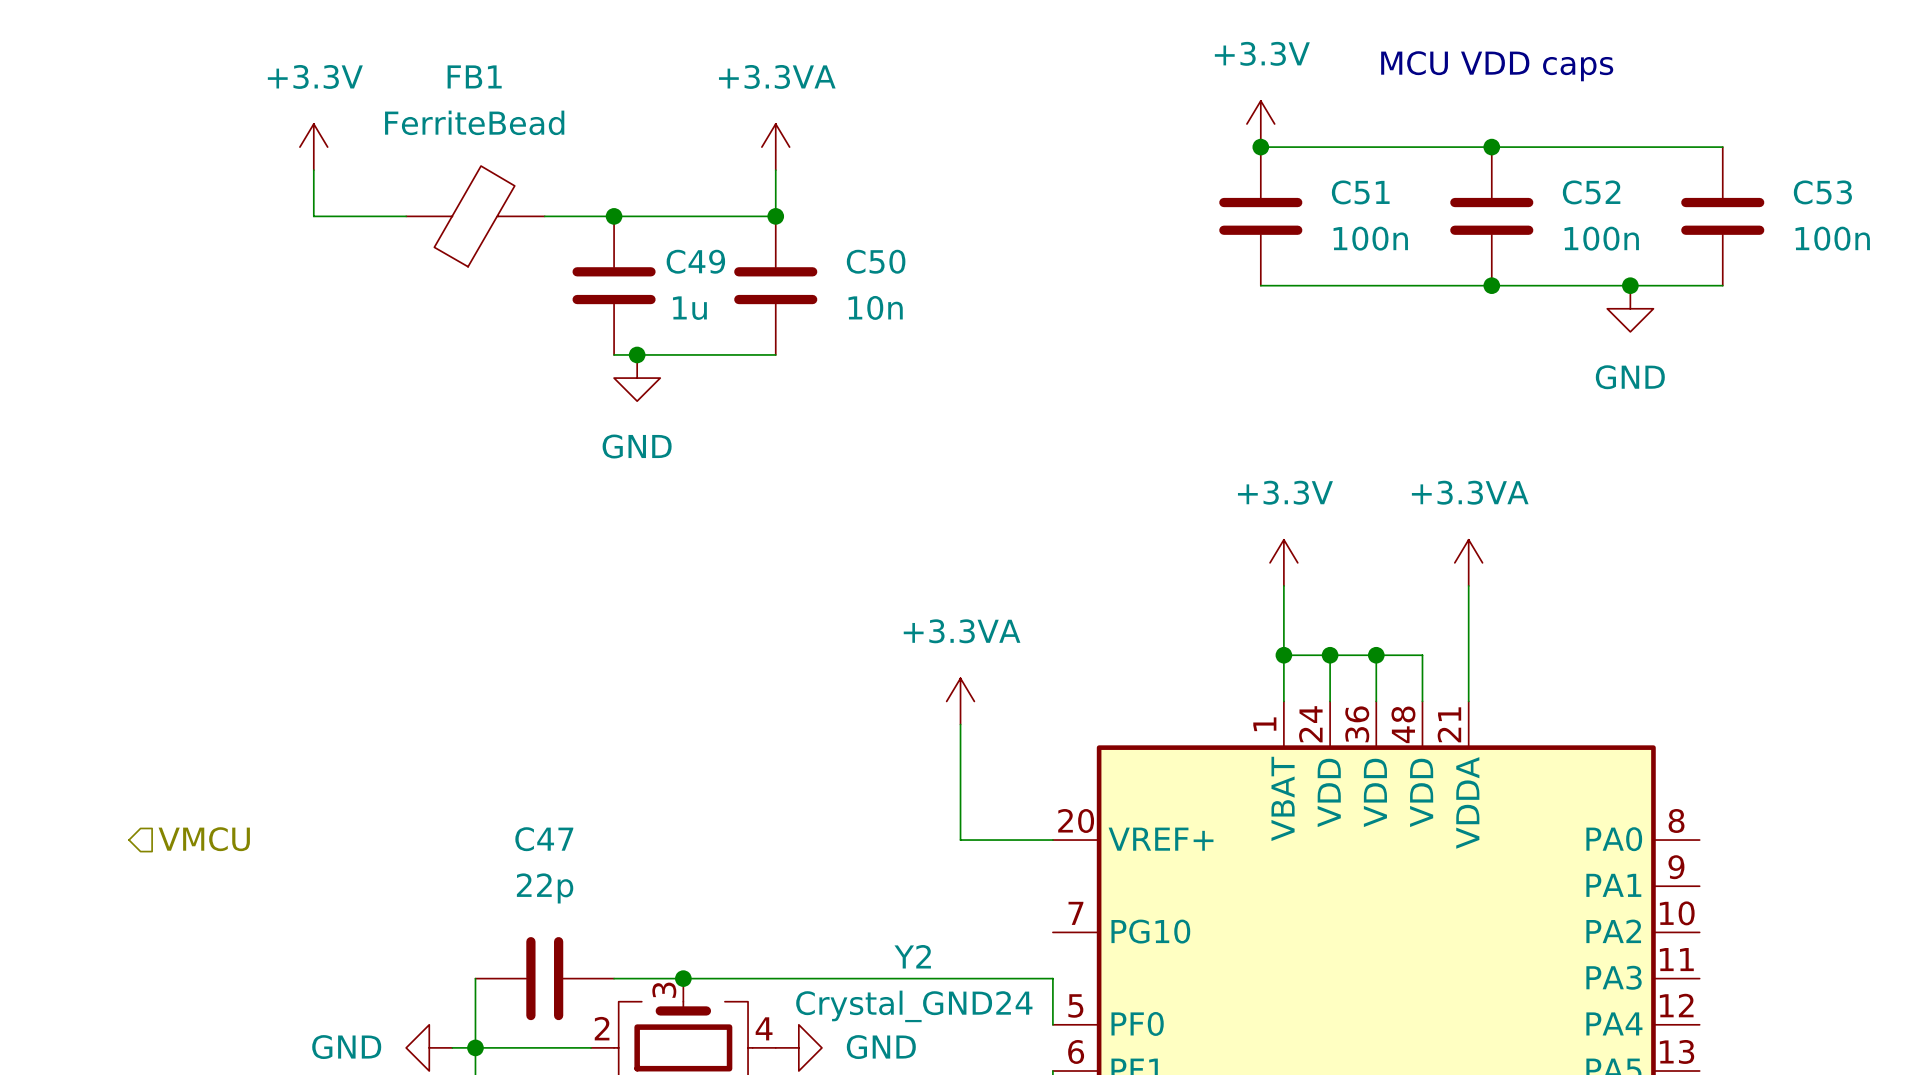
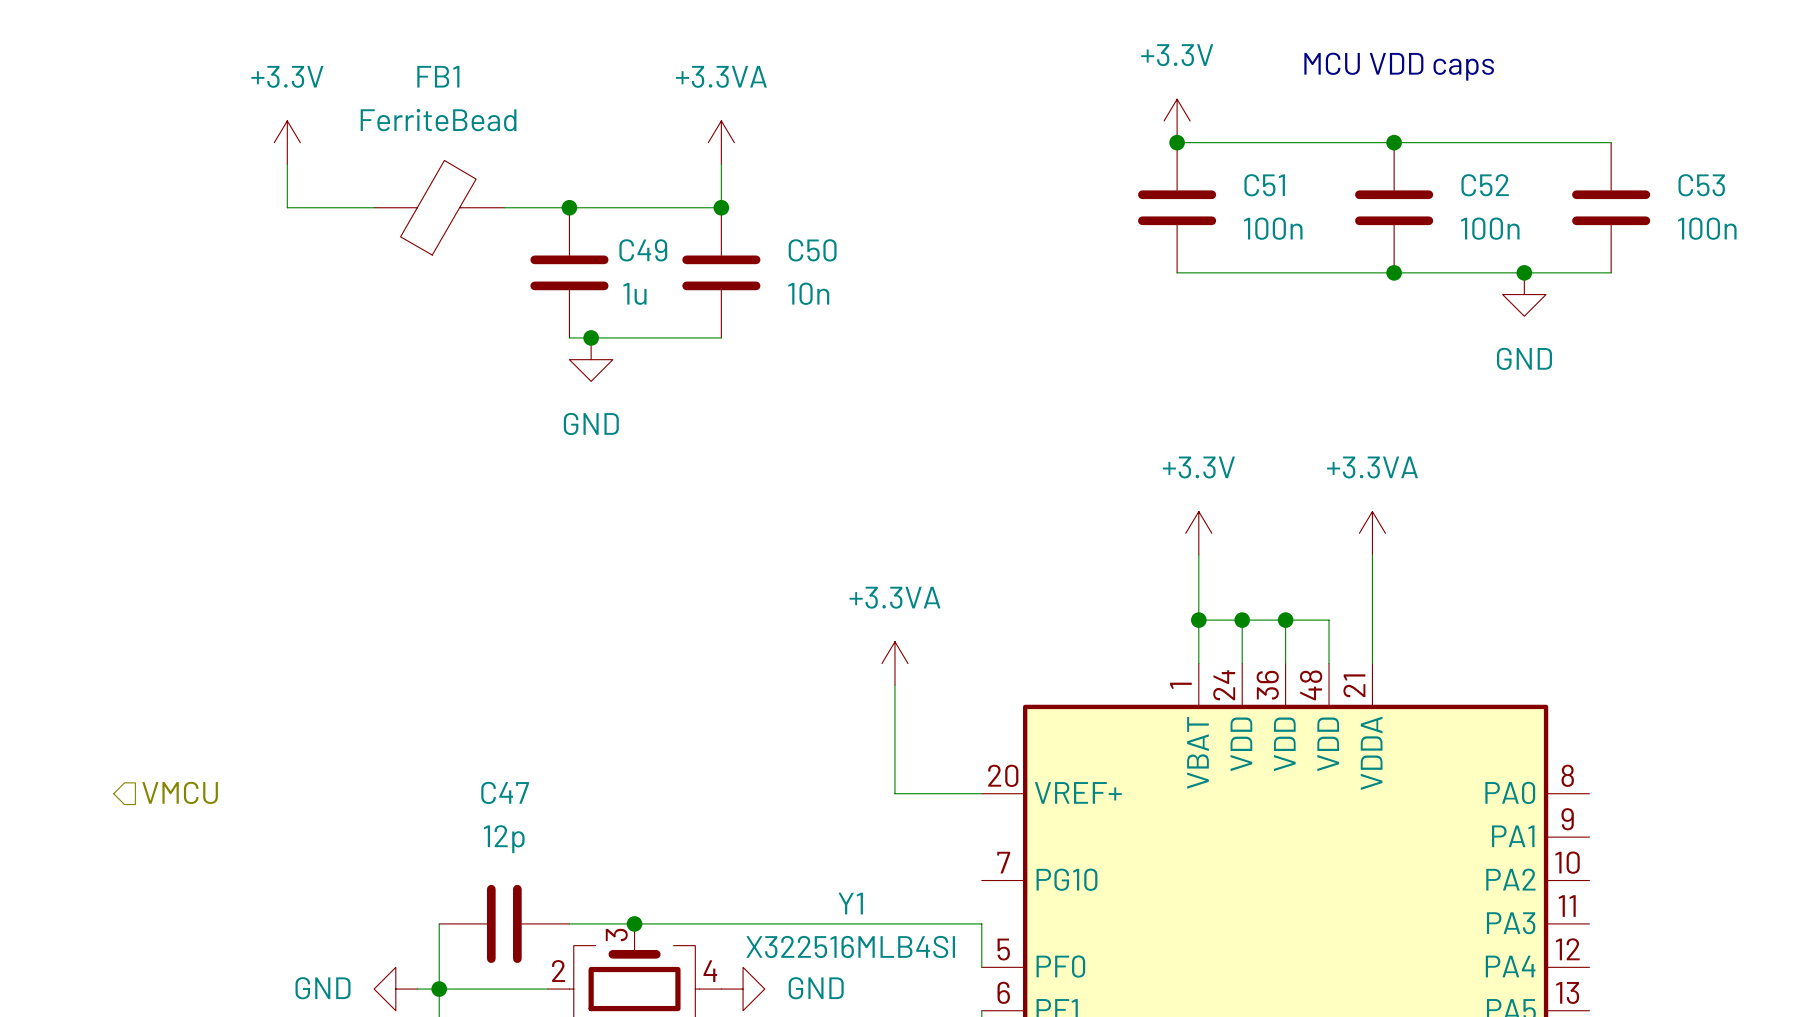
C47 value: 22p (545, 888) -> 12p (504, 839)
Y2 name: Y2 (912, 956) -> Y1 (850, 903)
Y2 value: Crystal_GND24 (914, 1006) -> X322516MLB4SI (850, 946)

